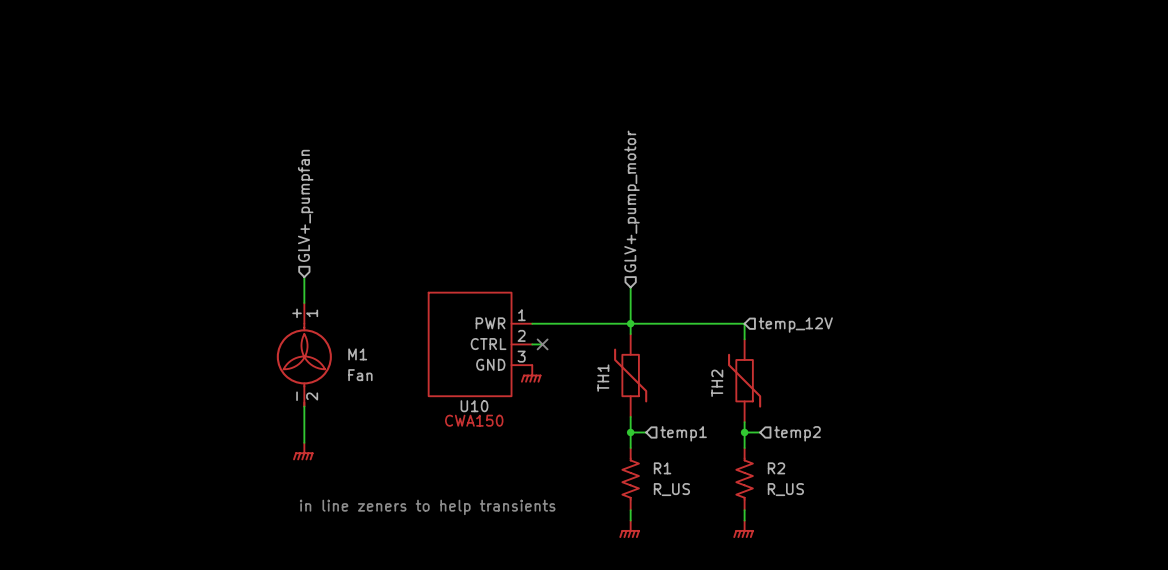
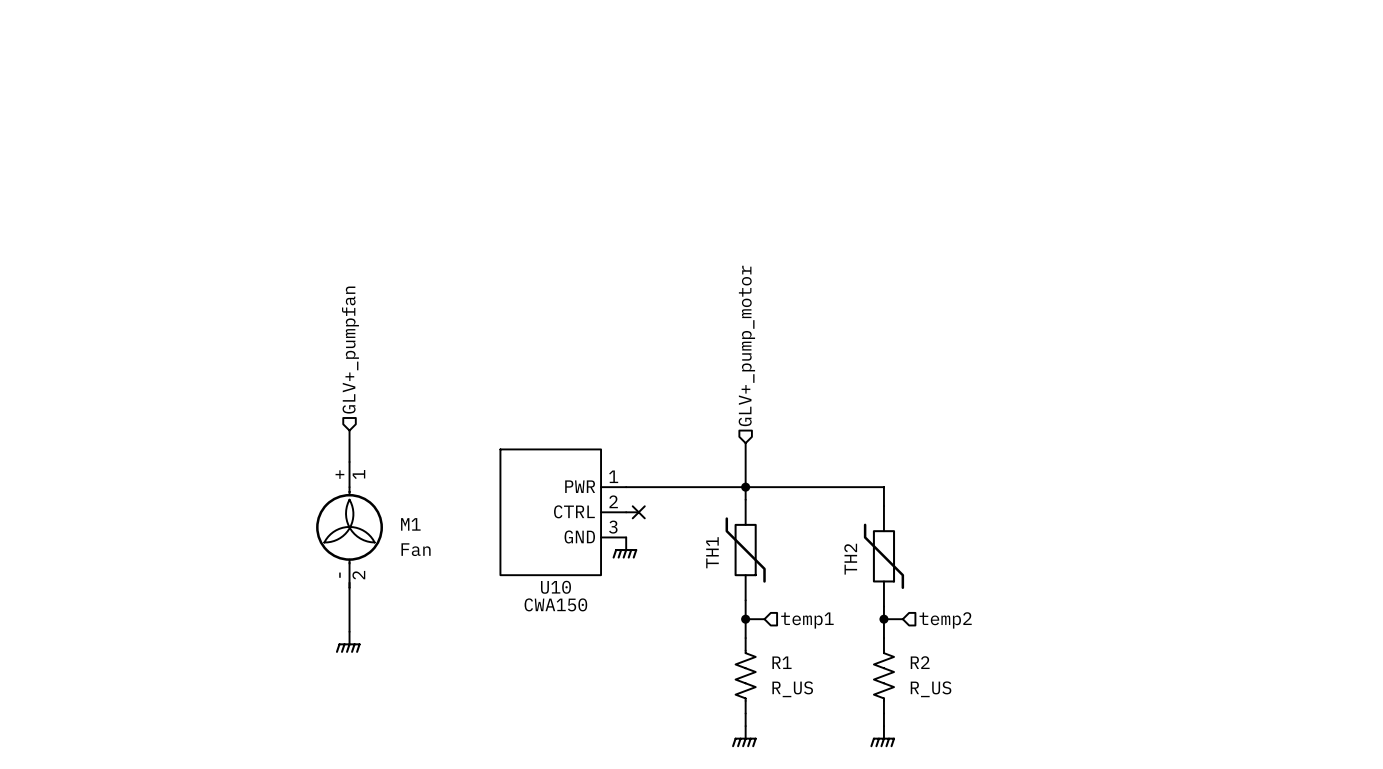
hierarchical label: temp_12V (795, 325) -> none
text: in line zeners to help transients (427, 507) -> none

